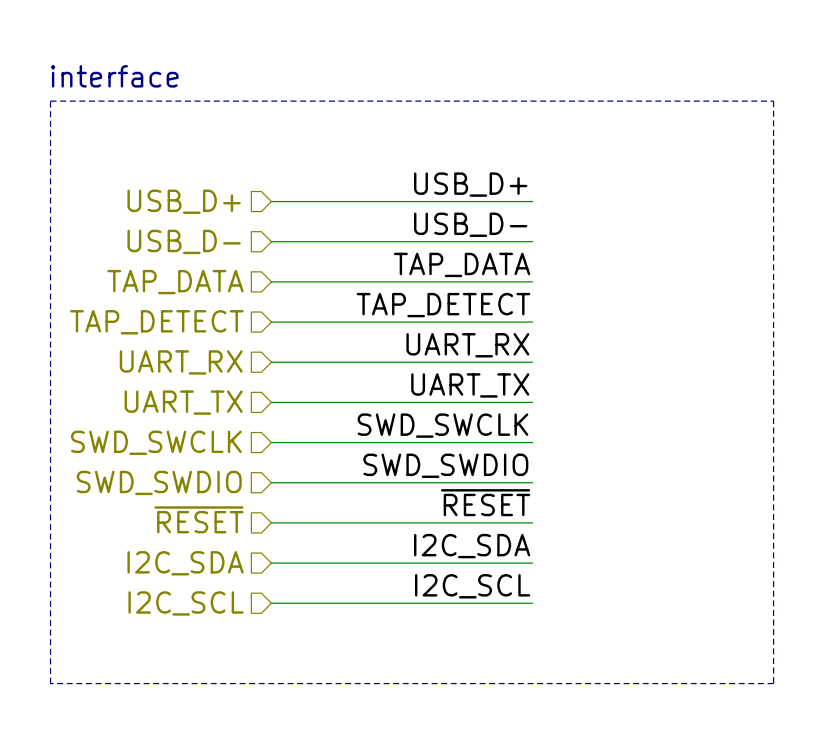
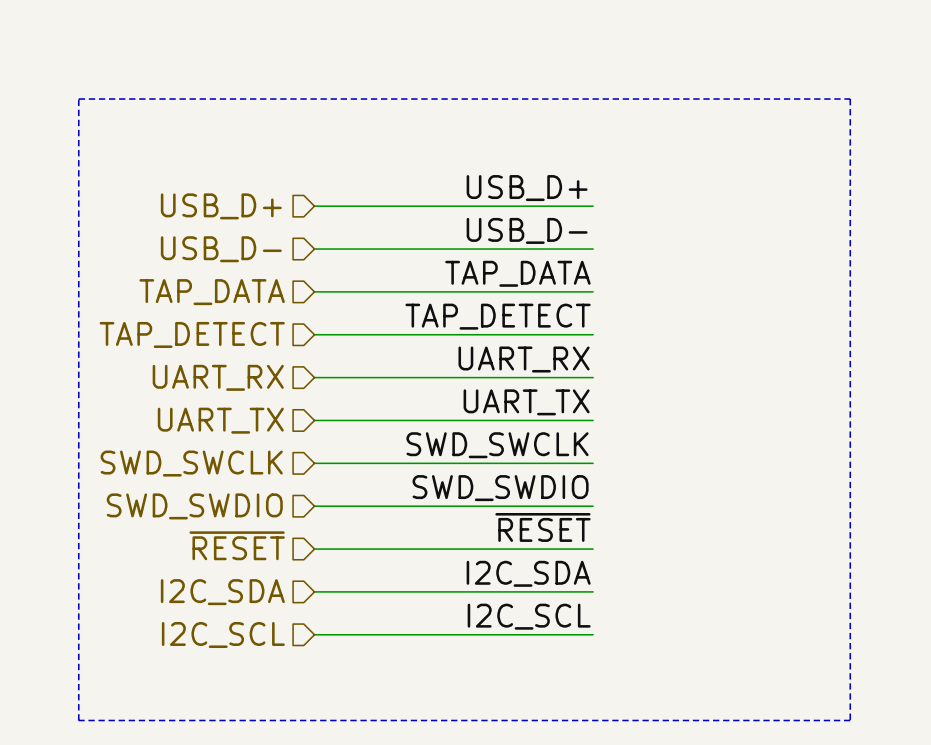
text: interface (114, 76) -> none

